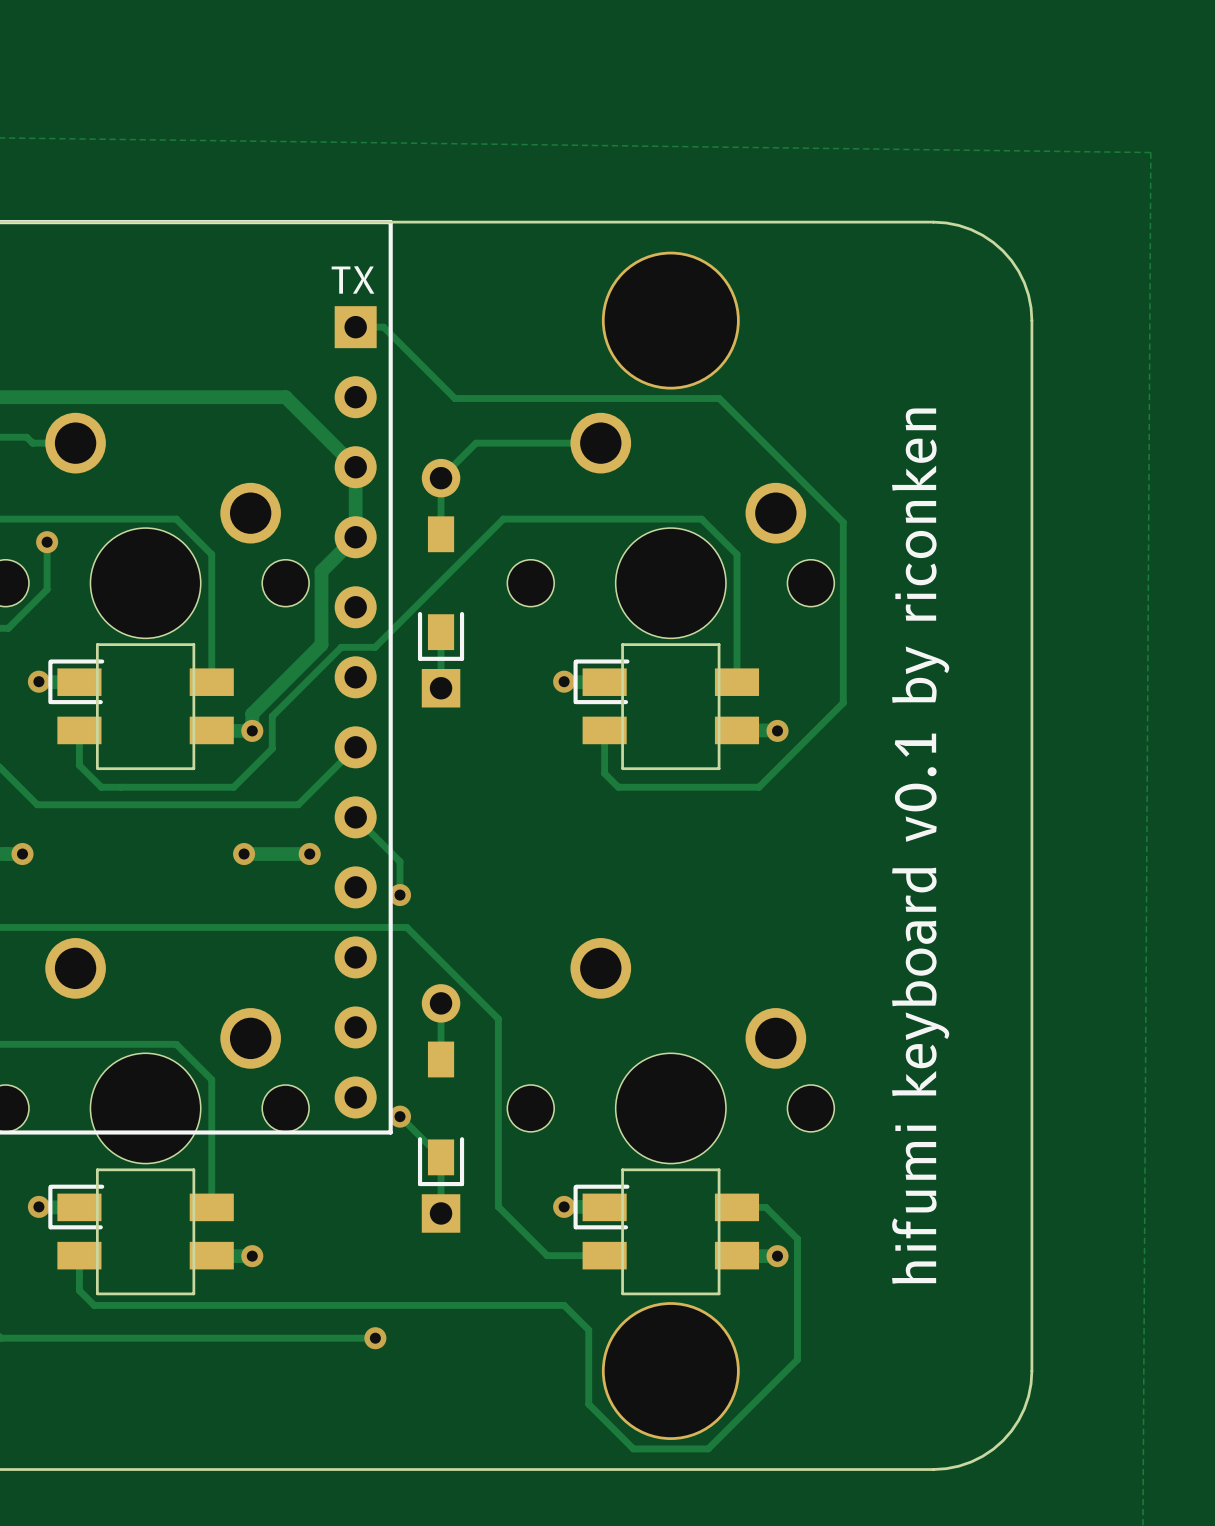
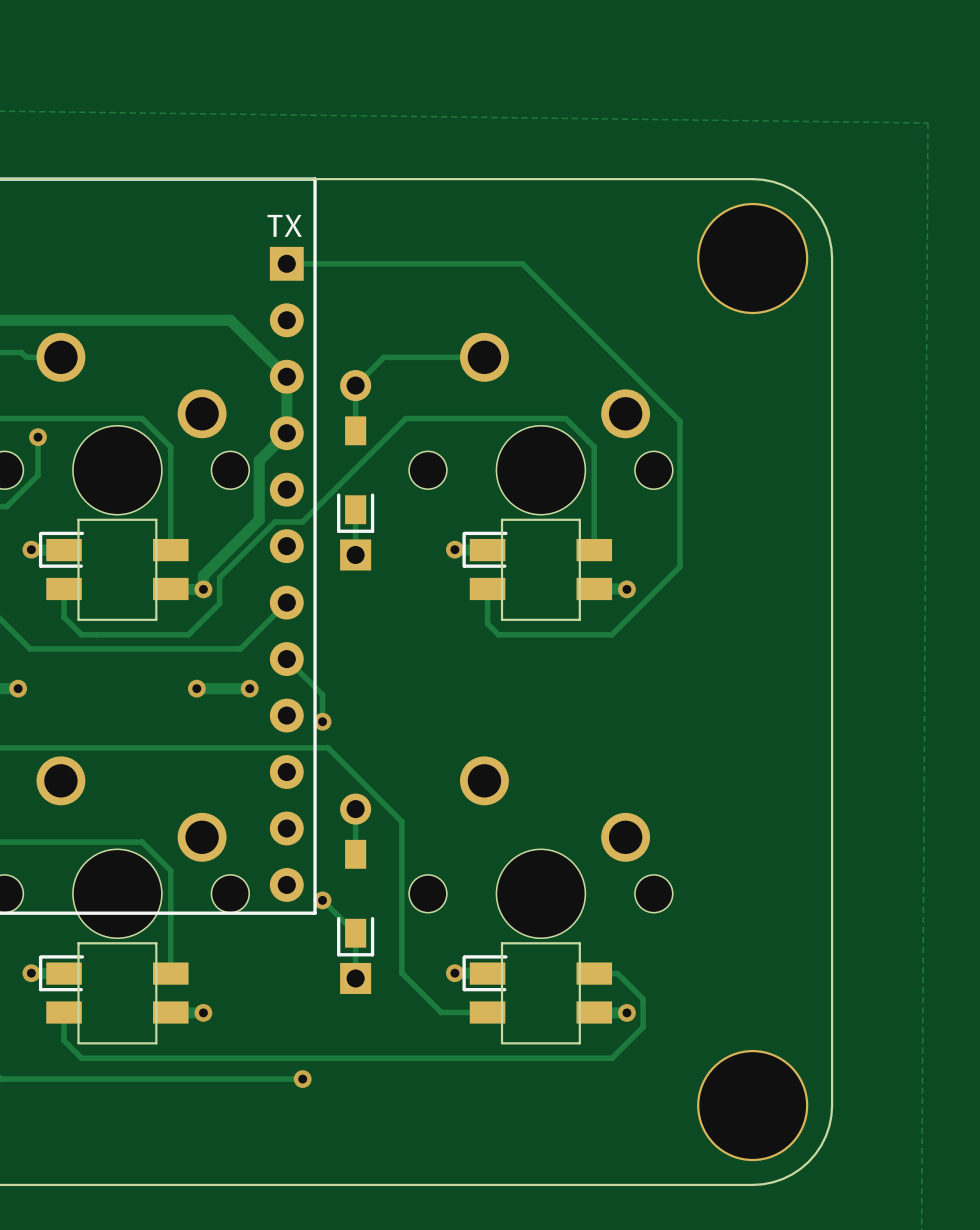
part position: (670, 320) -> (752, 258)
track: (383, 327) (454, 398) (719, 398) -> (309, 263) (522, 263) (580, 321)
text: hifumi keyboard v0.1 by riconken (920, 846) -> none
track: (797, 1273) (797, 1359) (708, 1448) (633, 1448) (588, 1404) (588, 1330) (564, 1305) (94, 1305) -> (643, 1027) (612, 1058) (81, 1058) (75, 1052)
part position: (670, 1371) -> (752, 1105)

